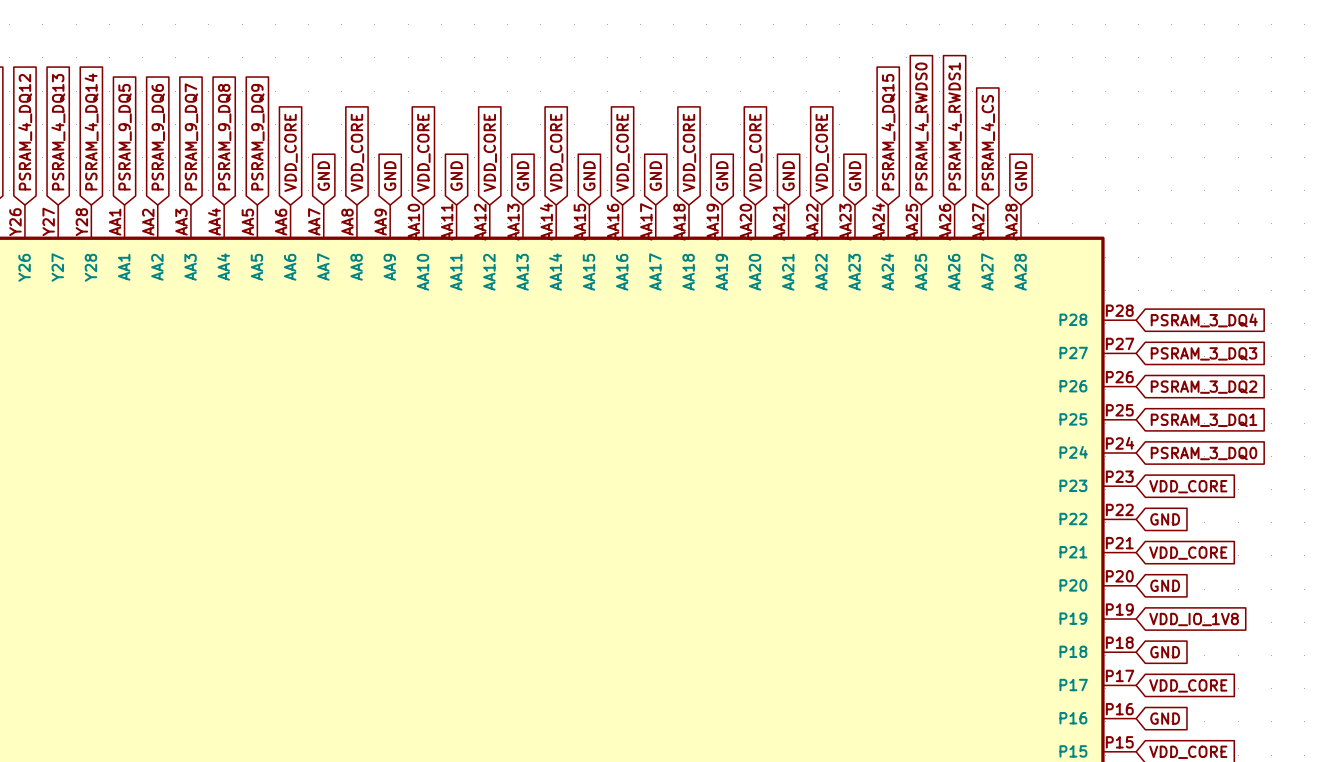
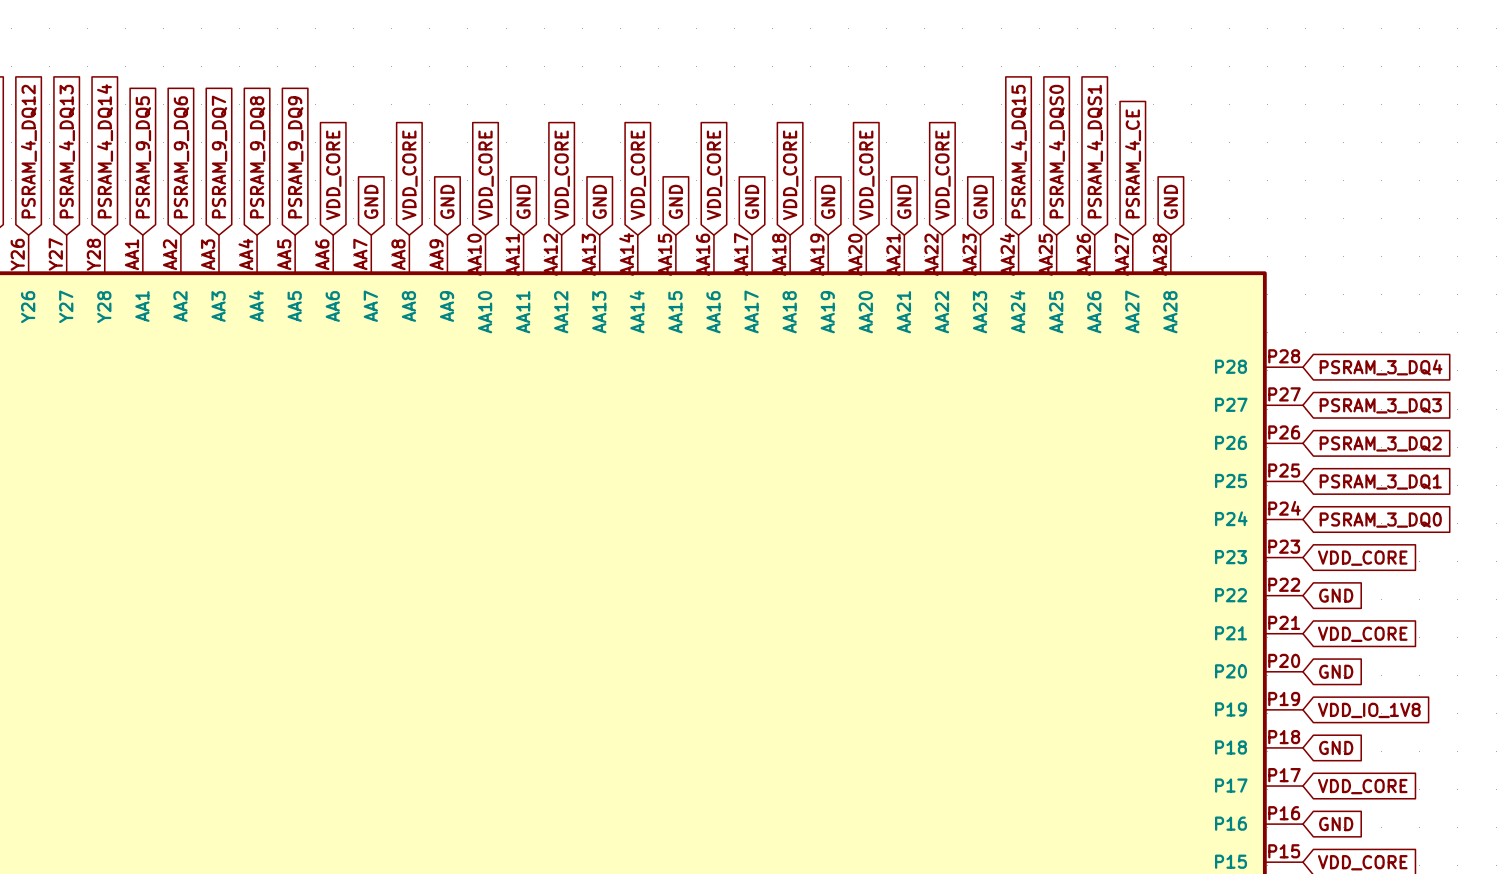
global label: PSRAM_4_RWDS0 (921, 126) -> PSRAM_4_DQS0 (1056, 151)
global label: PSRAM_4_RWDS1 (954, 126) -> PSRAM_4_DQS1 (1095, 151)
global label: PSRAM_4_CS (988, 142) -> PSRAM_4_CE (1133, 163)

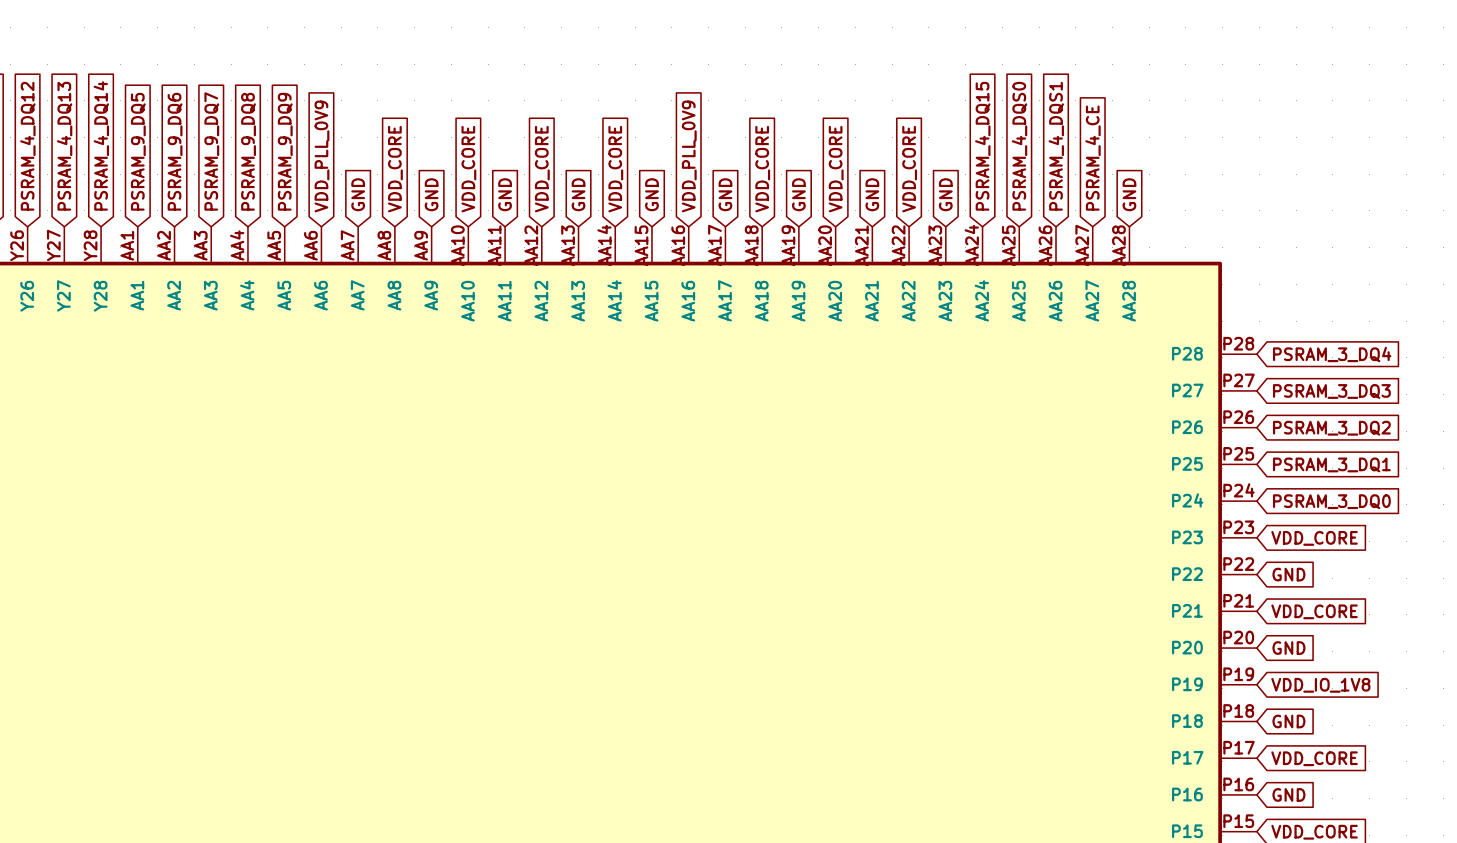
global label: VDD_CORE (333, 175) -> VDD_PLL_0V9 (321, 156)
global label: VDD_CORE (714, 175) -> VDD_PLL_0V9 (689, 156)

